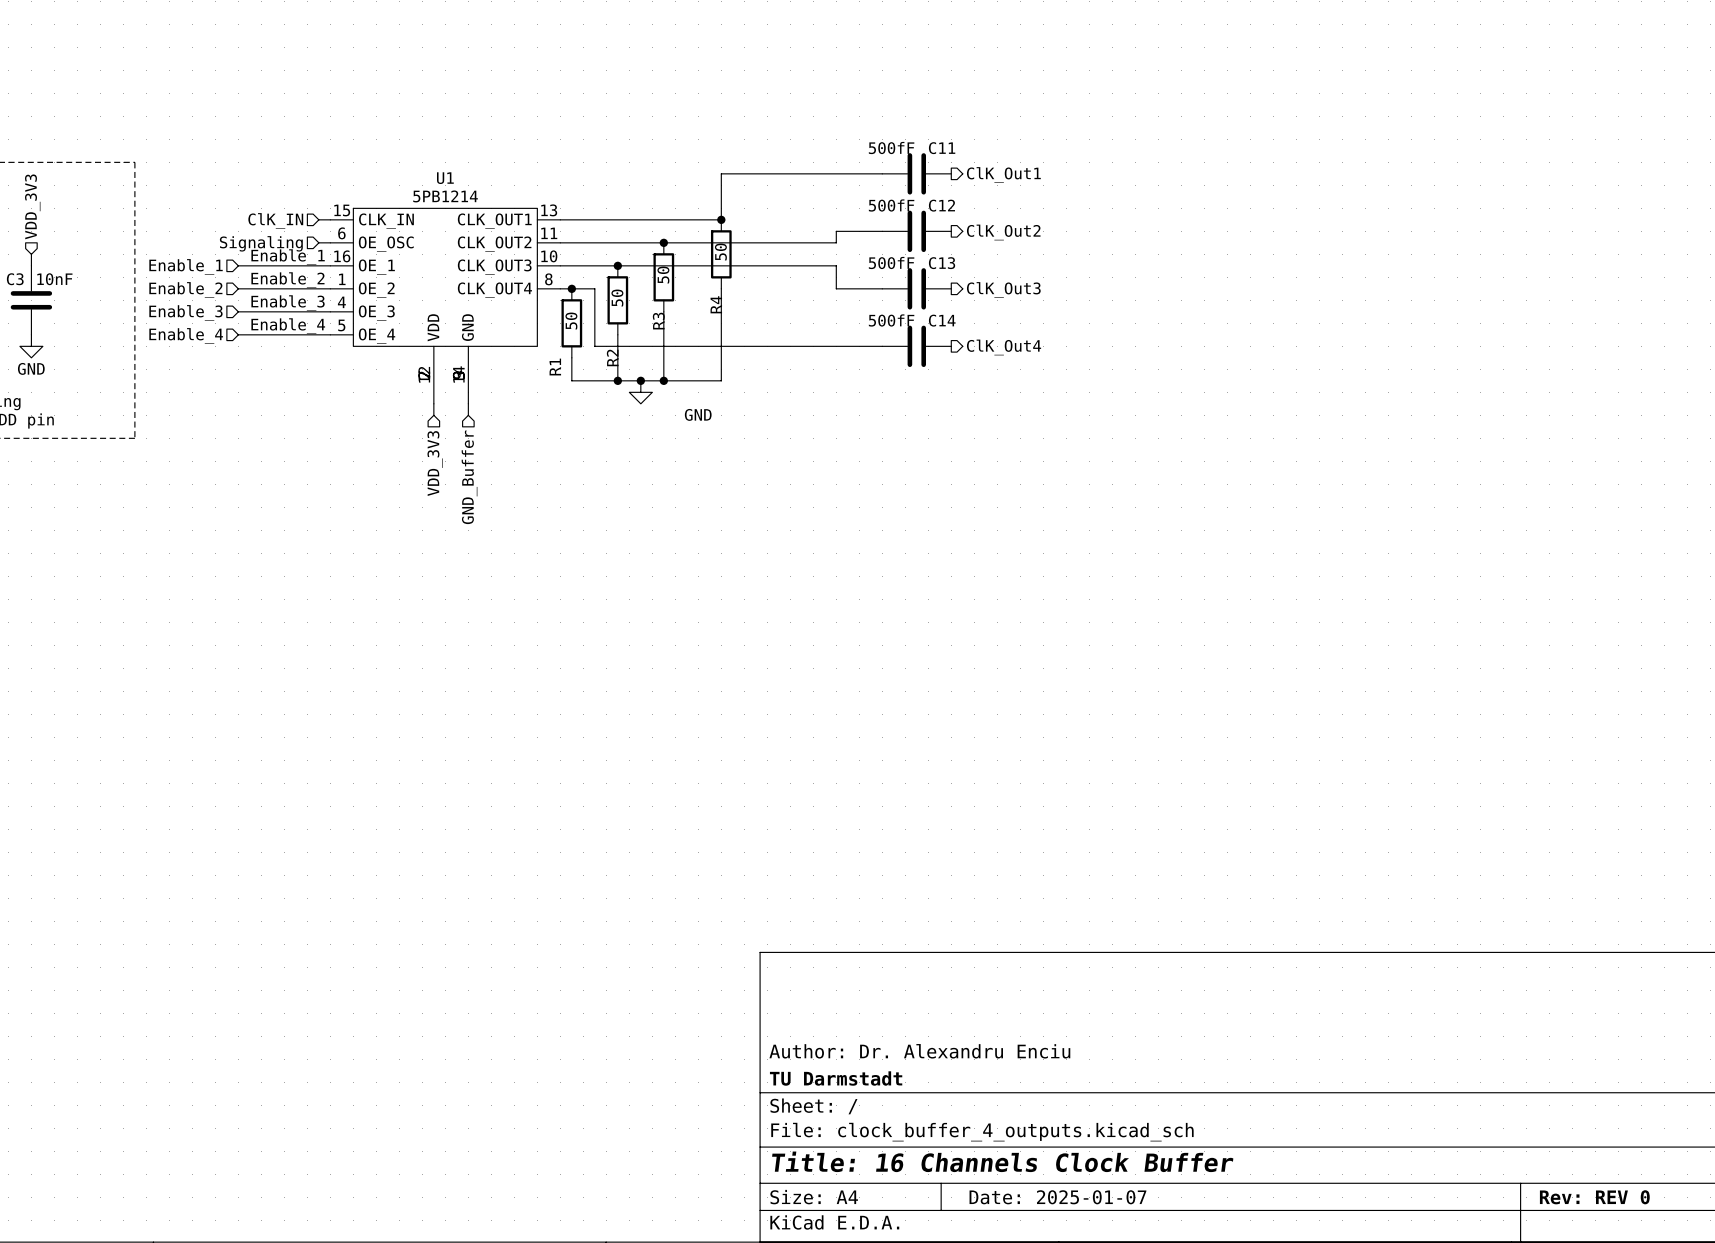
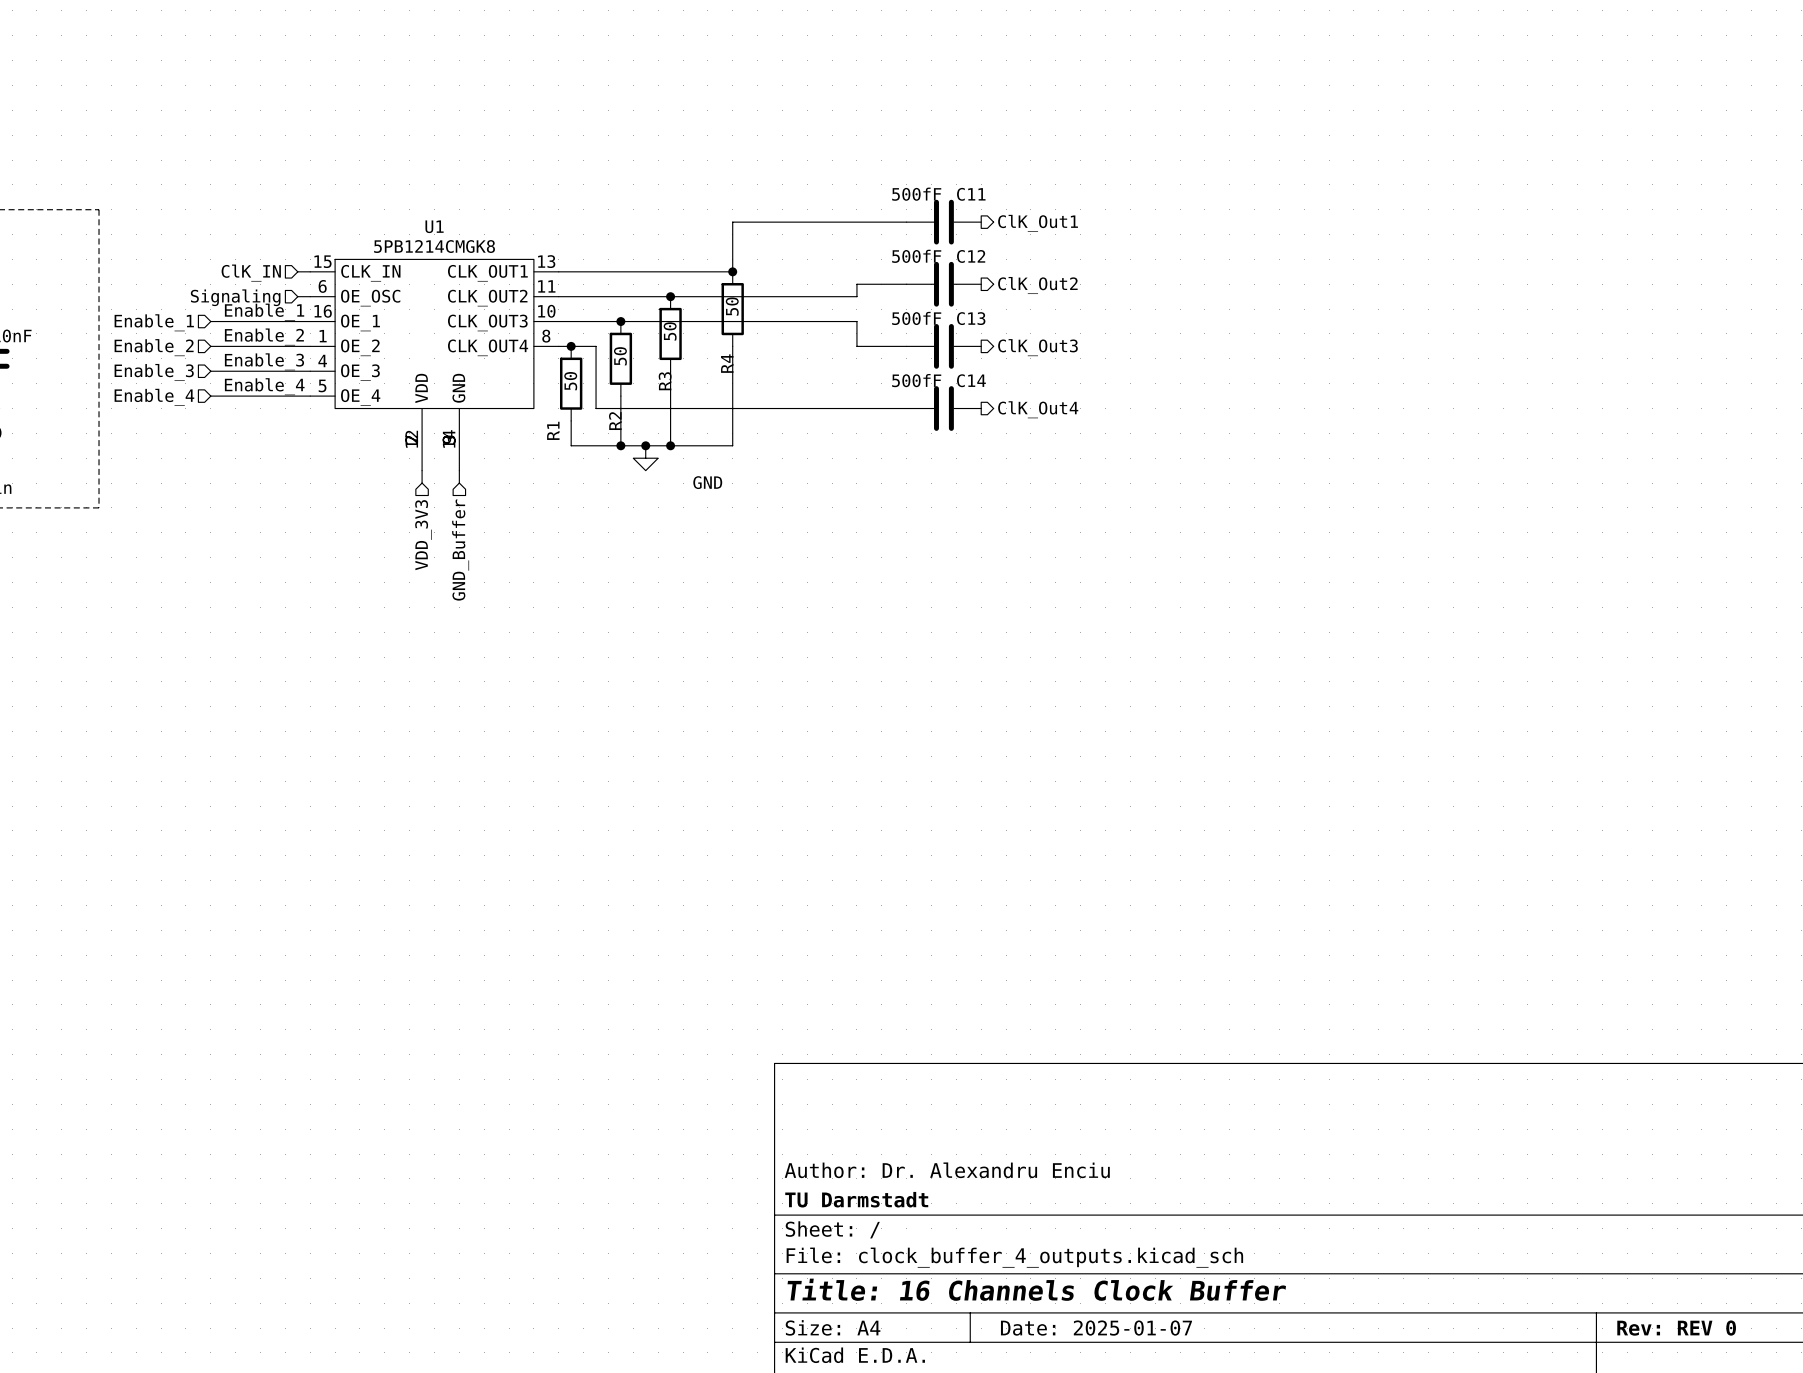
U1 value: 5PB1214 (445, 196) -> 5PB1214CMGK8 (434, 246)

